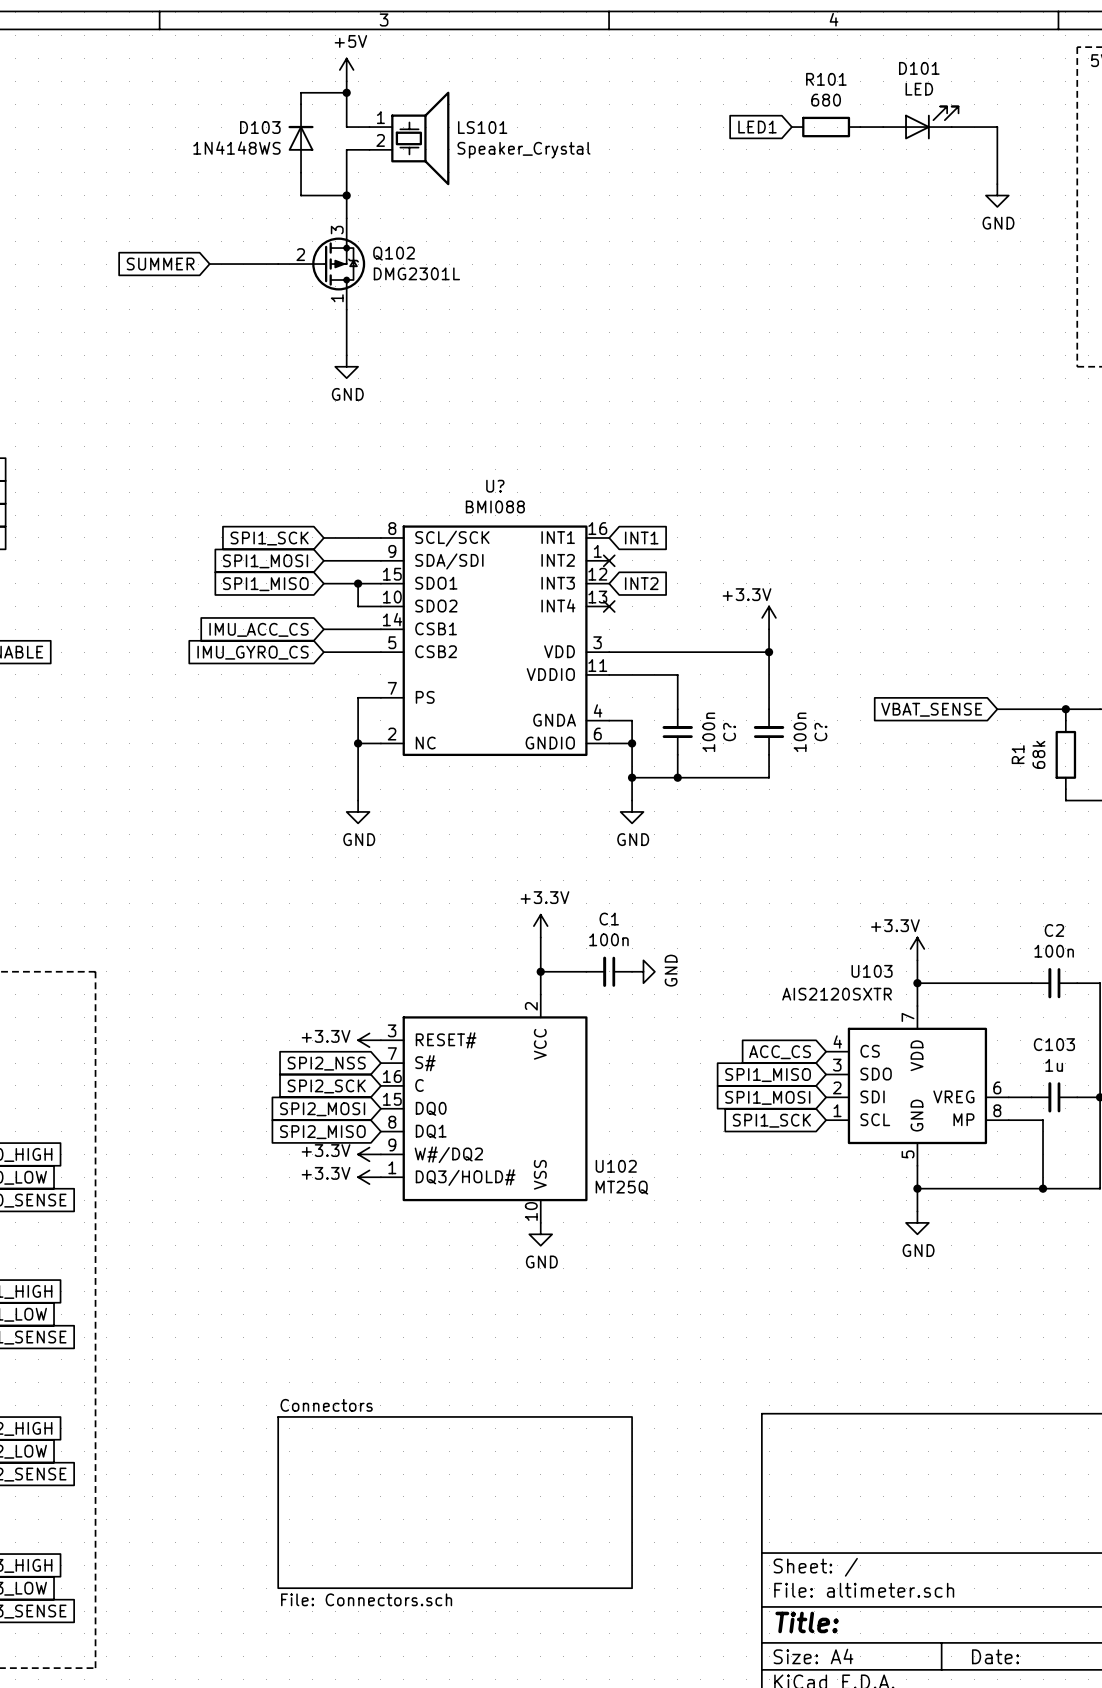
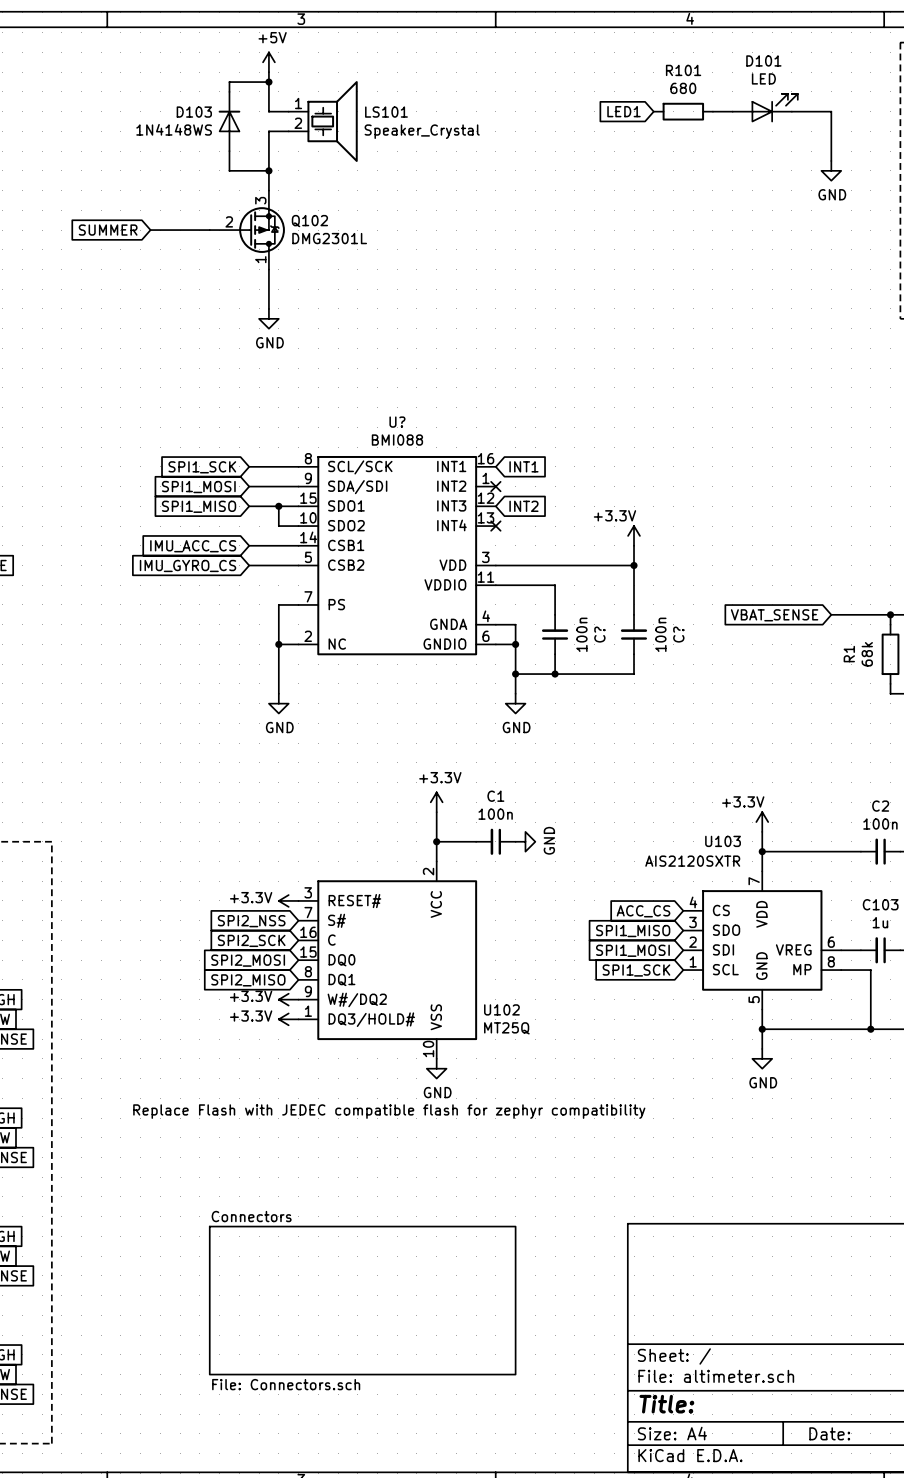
text: none -> Replace Flash with JEDEC compatible flash for zephyr compatibility (389, 1111)

